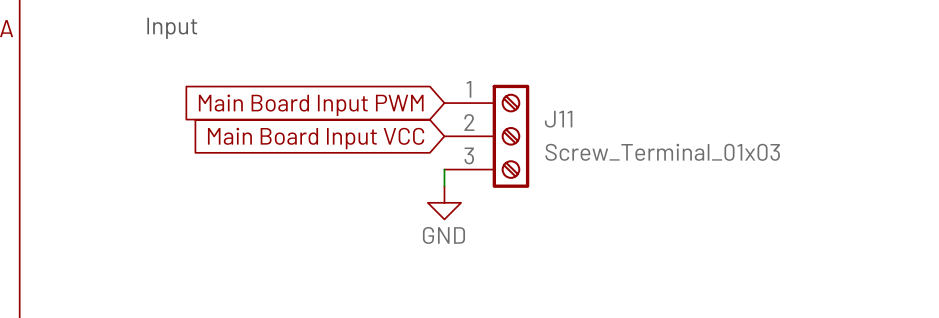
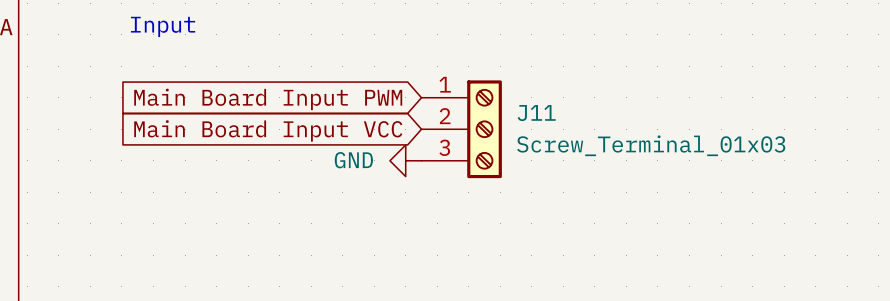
wire: (444, 169) (444, 186) -> none
power symbol rotation: 0° (444, 202) -> 90° clockwise (405, 160)
power symbol position: GND (444, 202) -> GND (405, 160)
power symbol text position: GND (443, 235) -> GND (353, 160)

